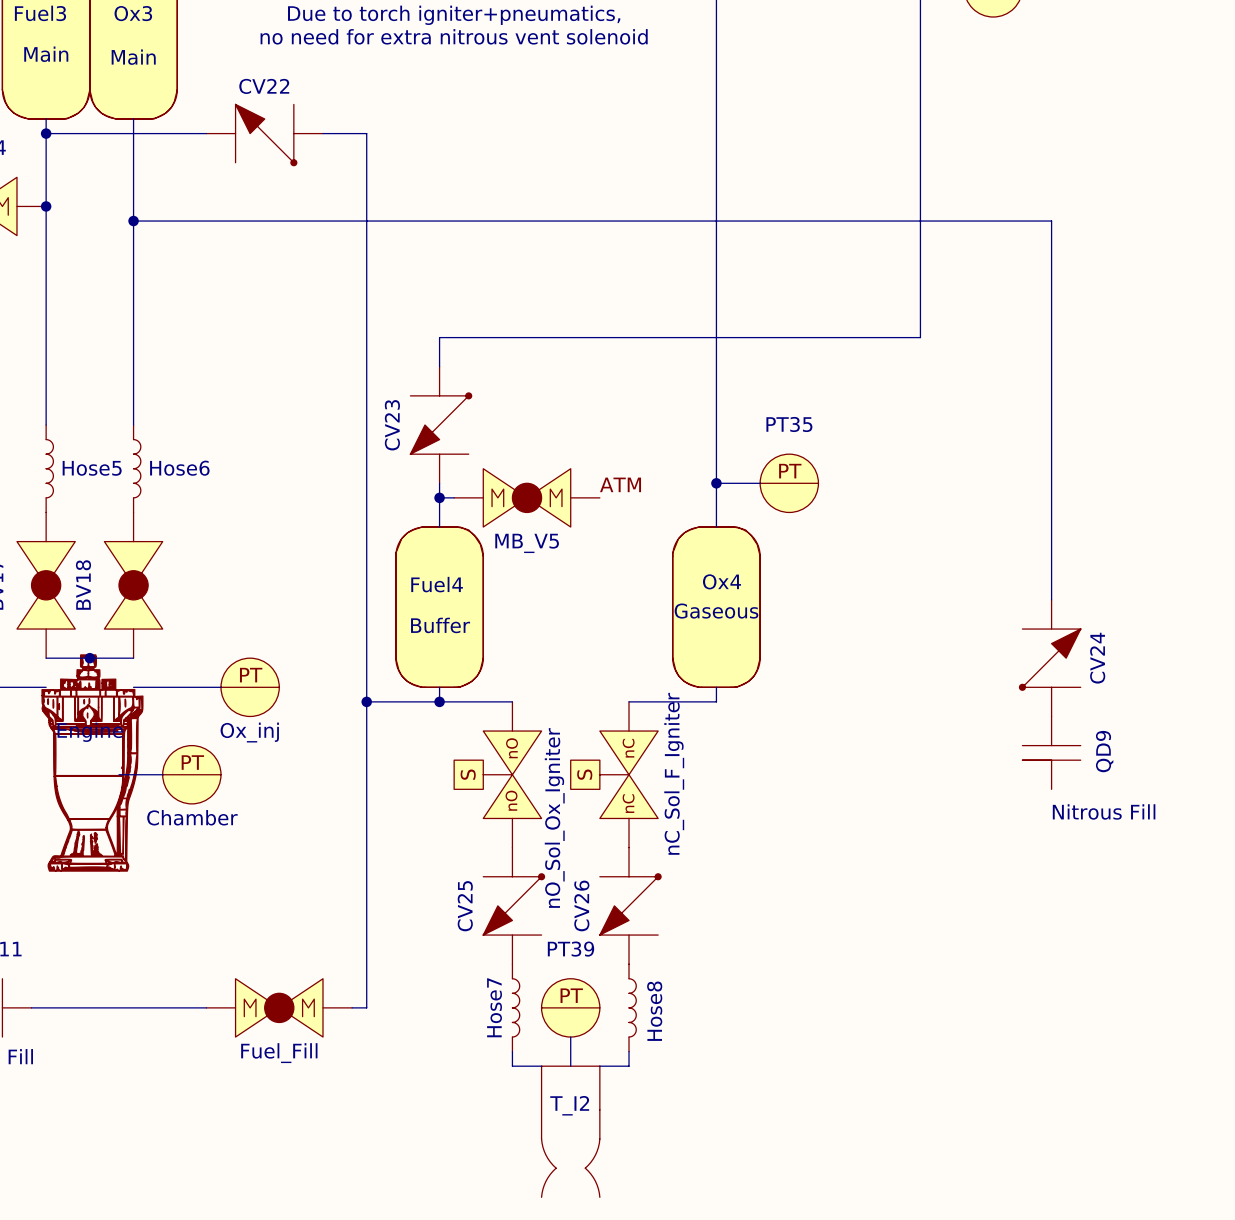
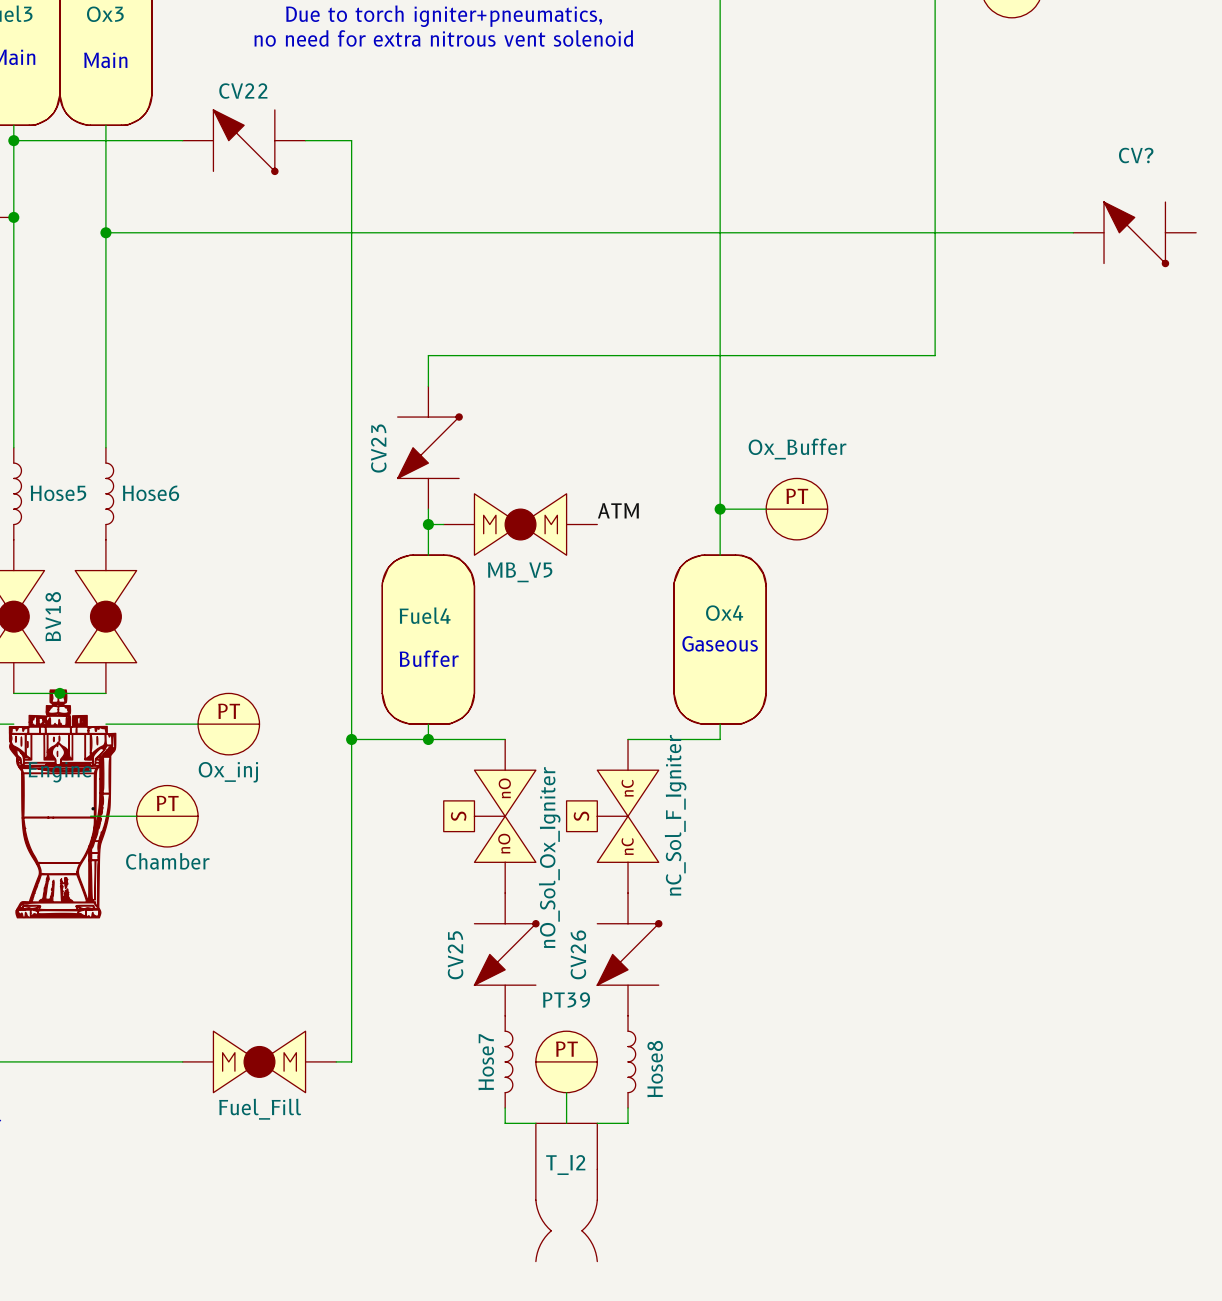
wire: (1051, 221) (1051, 599) -> none
CV?: none -> (1134, 234)
PT35 name: PT35 (789, 424) -> Ox_Buffer (797, 448)
CV24: (1050, 658) -> none
QD9: (1051, 752) -> none
text: Nitrous Fill (1104, 811) -> none

